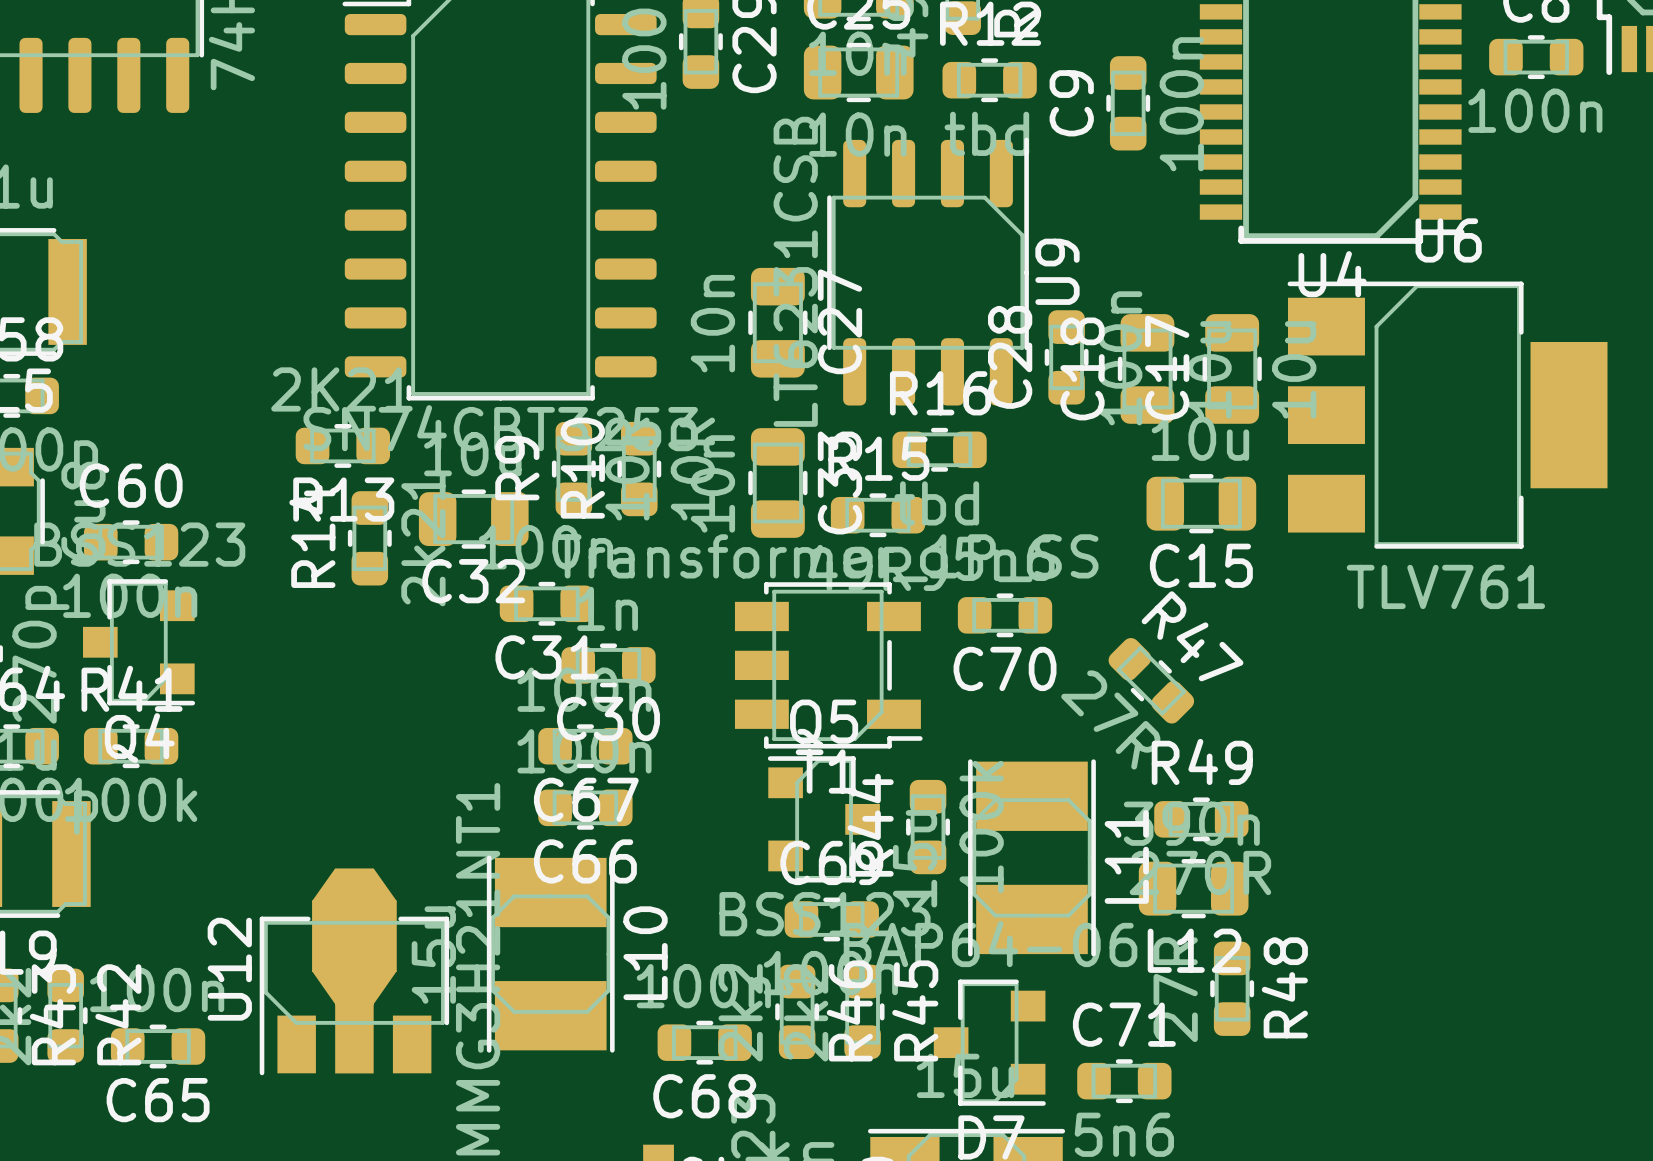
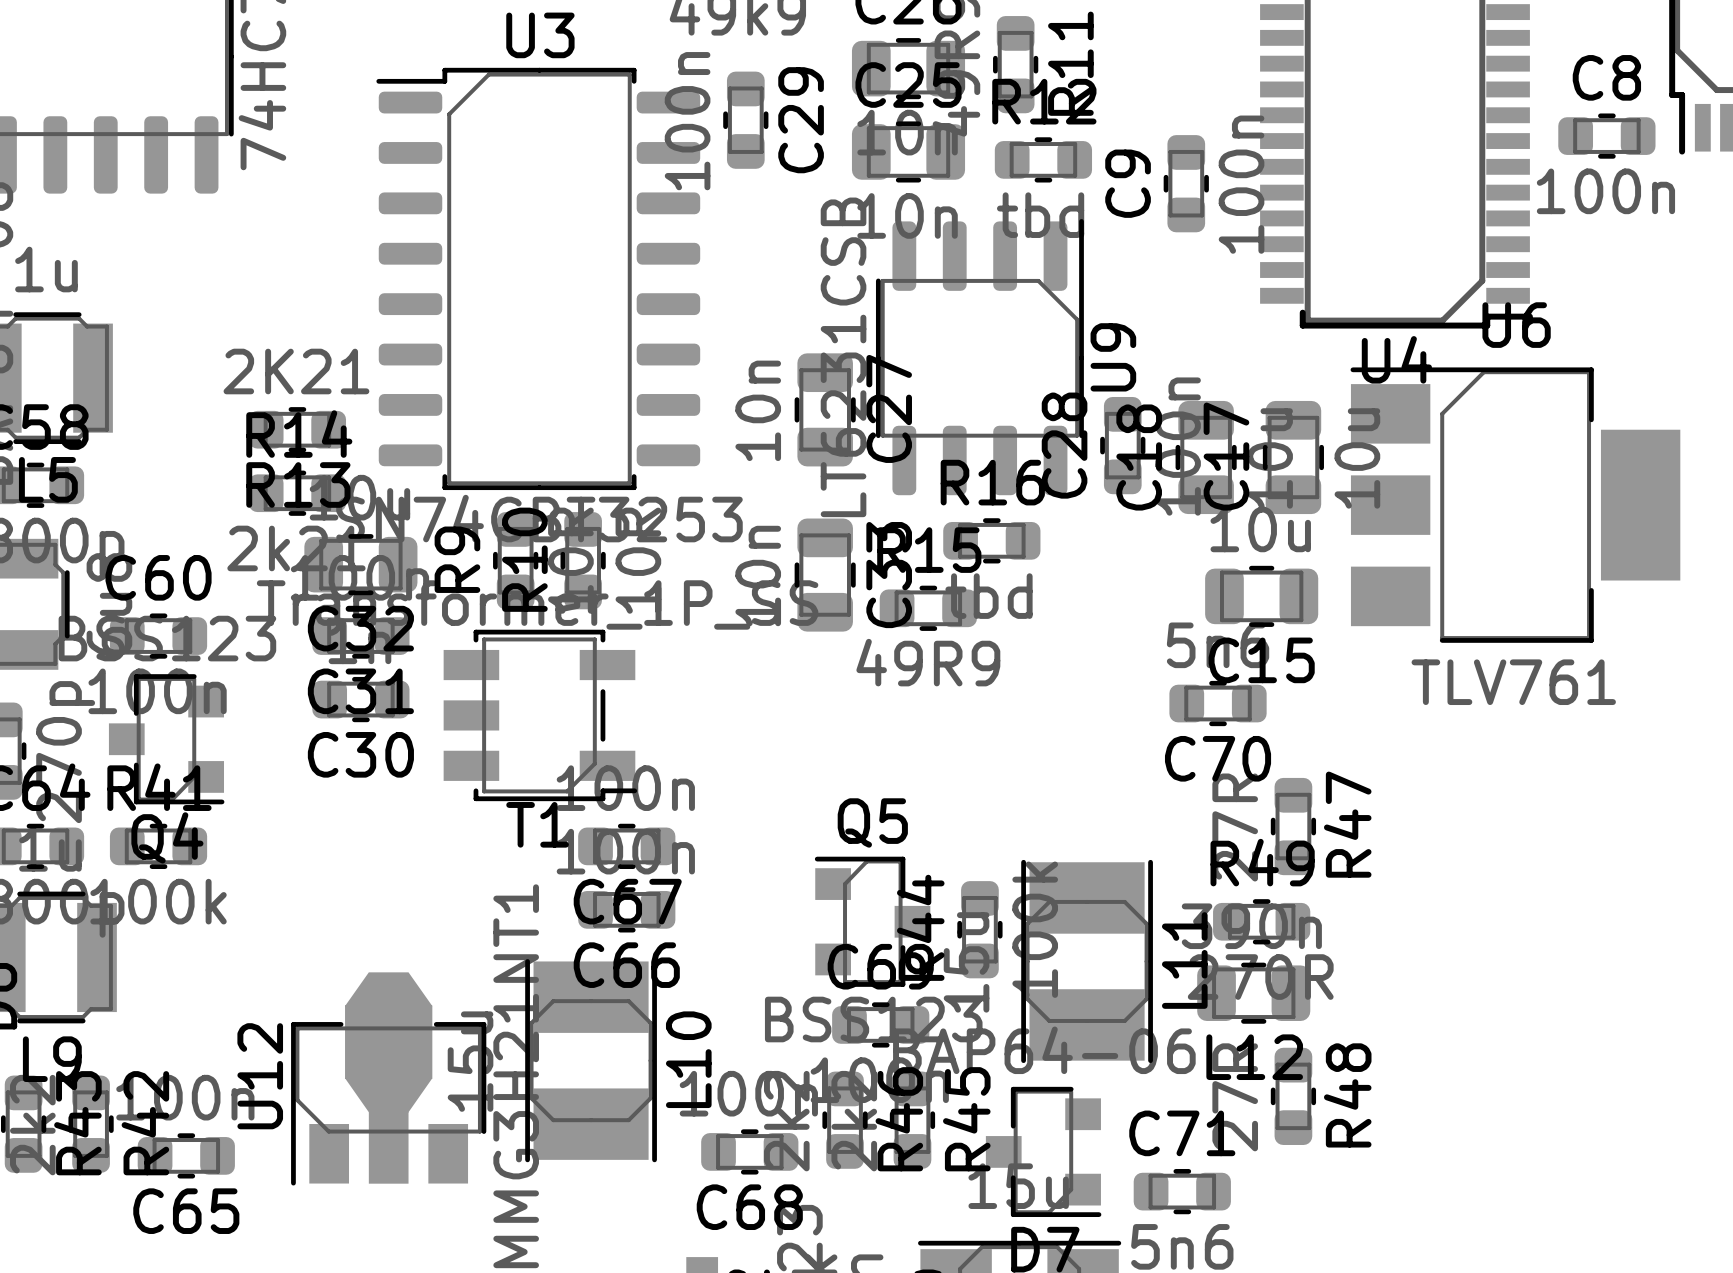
R13 position: (342, 445) -> (297, 429)
R9 position: (573, 469) -> (515, 560)
R10 position: (639, 469) -> (583, 560)
C32 position: (473, 519) -> (360, 564)
R14 rotation: 0° (369, 538) -> 90° clockwise (297, 493)
R14 position: (369, 538) -> (297, 493)
C31 position: (546, 603) -> (360, 636)
C70 position: (1005, 615) -> (1218, 703)
C30 position: (608, 665) -> (360, 699)
T1 position: (828, 665) -> (540, 715)
R47 rotation: 0° (1151, 680) -> 45° clockwise (1293, 826)
R47 position: (1151, 680) -> (1293, 826)

